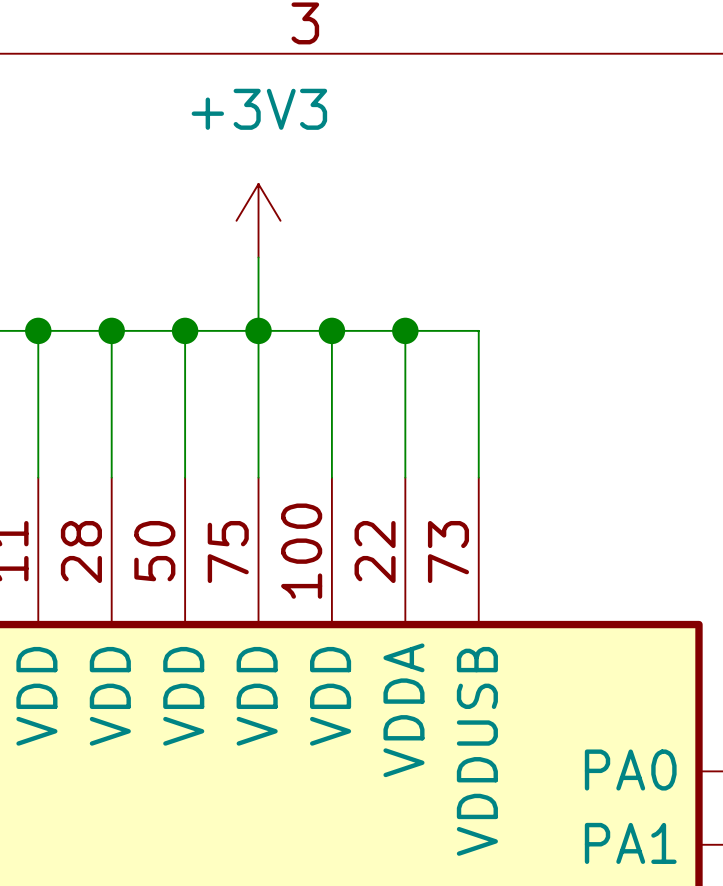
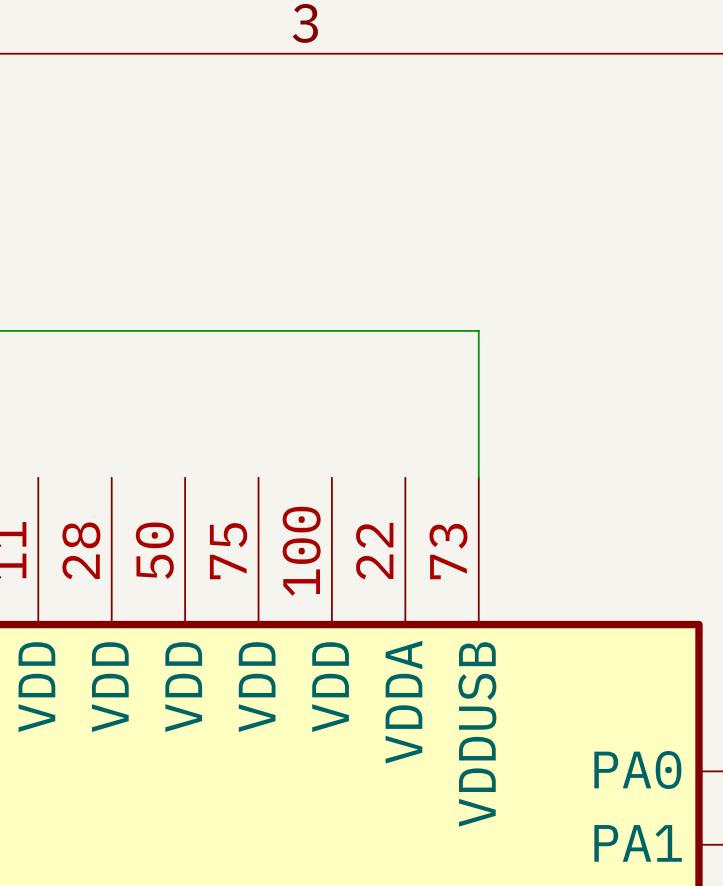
power symbol: +3V3 (258, 220) -> none
wire: (258, 257) (258, 477) -> none
wire: (38, 330) (38, 477) -> none
junction: (38, 330) -> none
wire: (111, 330) (111, 477) -> none
junction: (111, 330) -> none
wire: (185, 330) (185, 477) -> none
junction: (185, 330) -> none
junction: (258, 330) -> none
wire: (331, 330) (331, 477) -> none
junction: (331, 330) -> none
wire: (405, 330) (405, 477) -> none
junction: (405, 330) -> none

